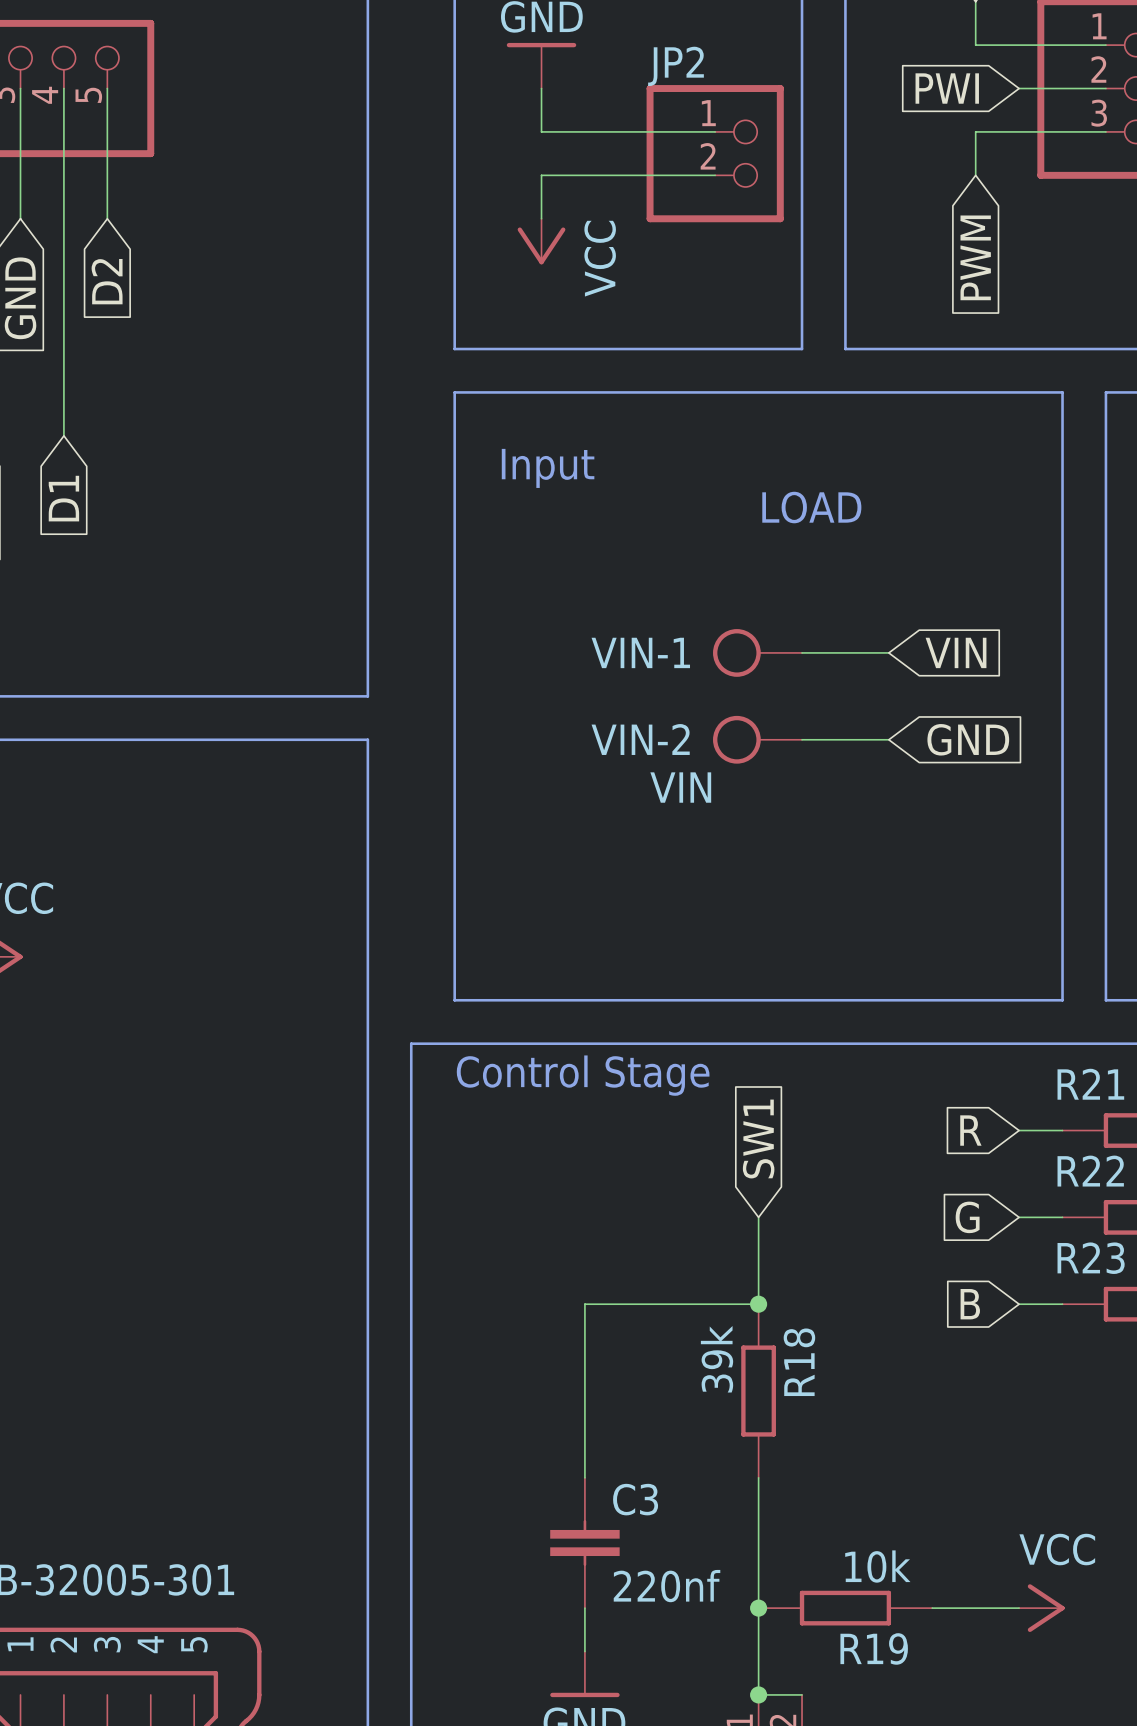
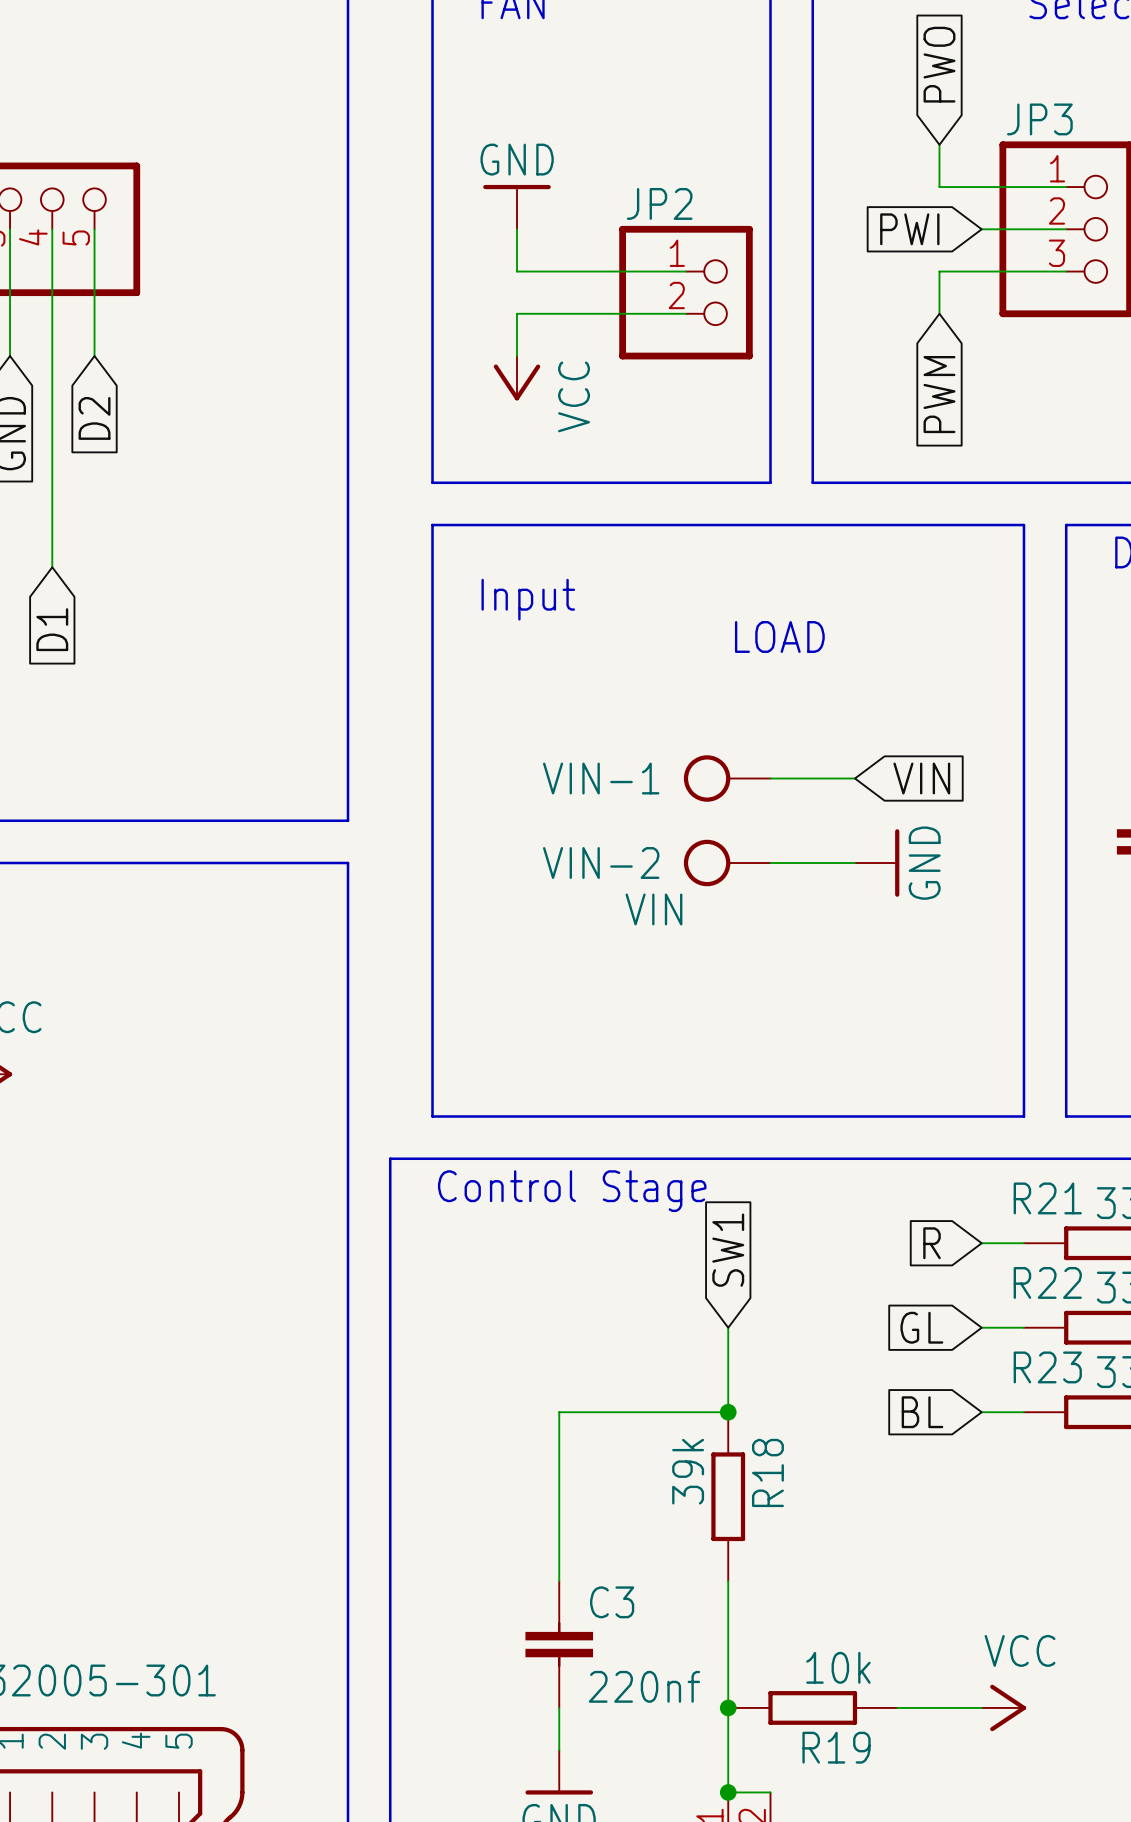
power symbol: none -> GND (877, 863)
global label: GND (968, 739) -> none
global label: G (967, 1217) -> GL (921, 1327)
global label: B (970, 1304) -> BL (922, 1412)

